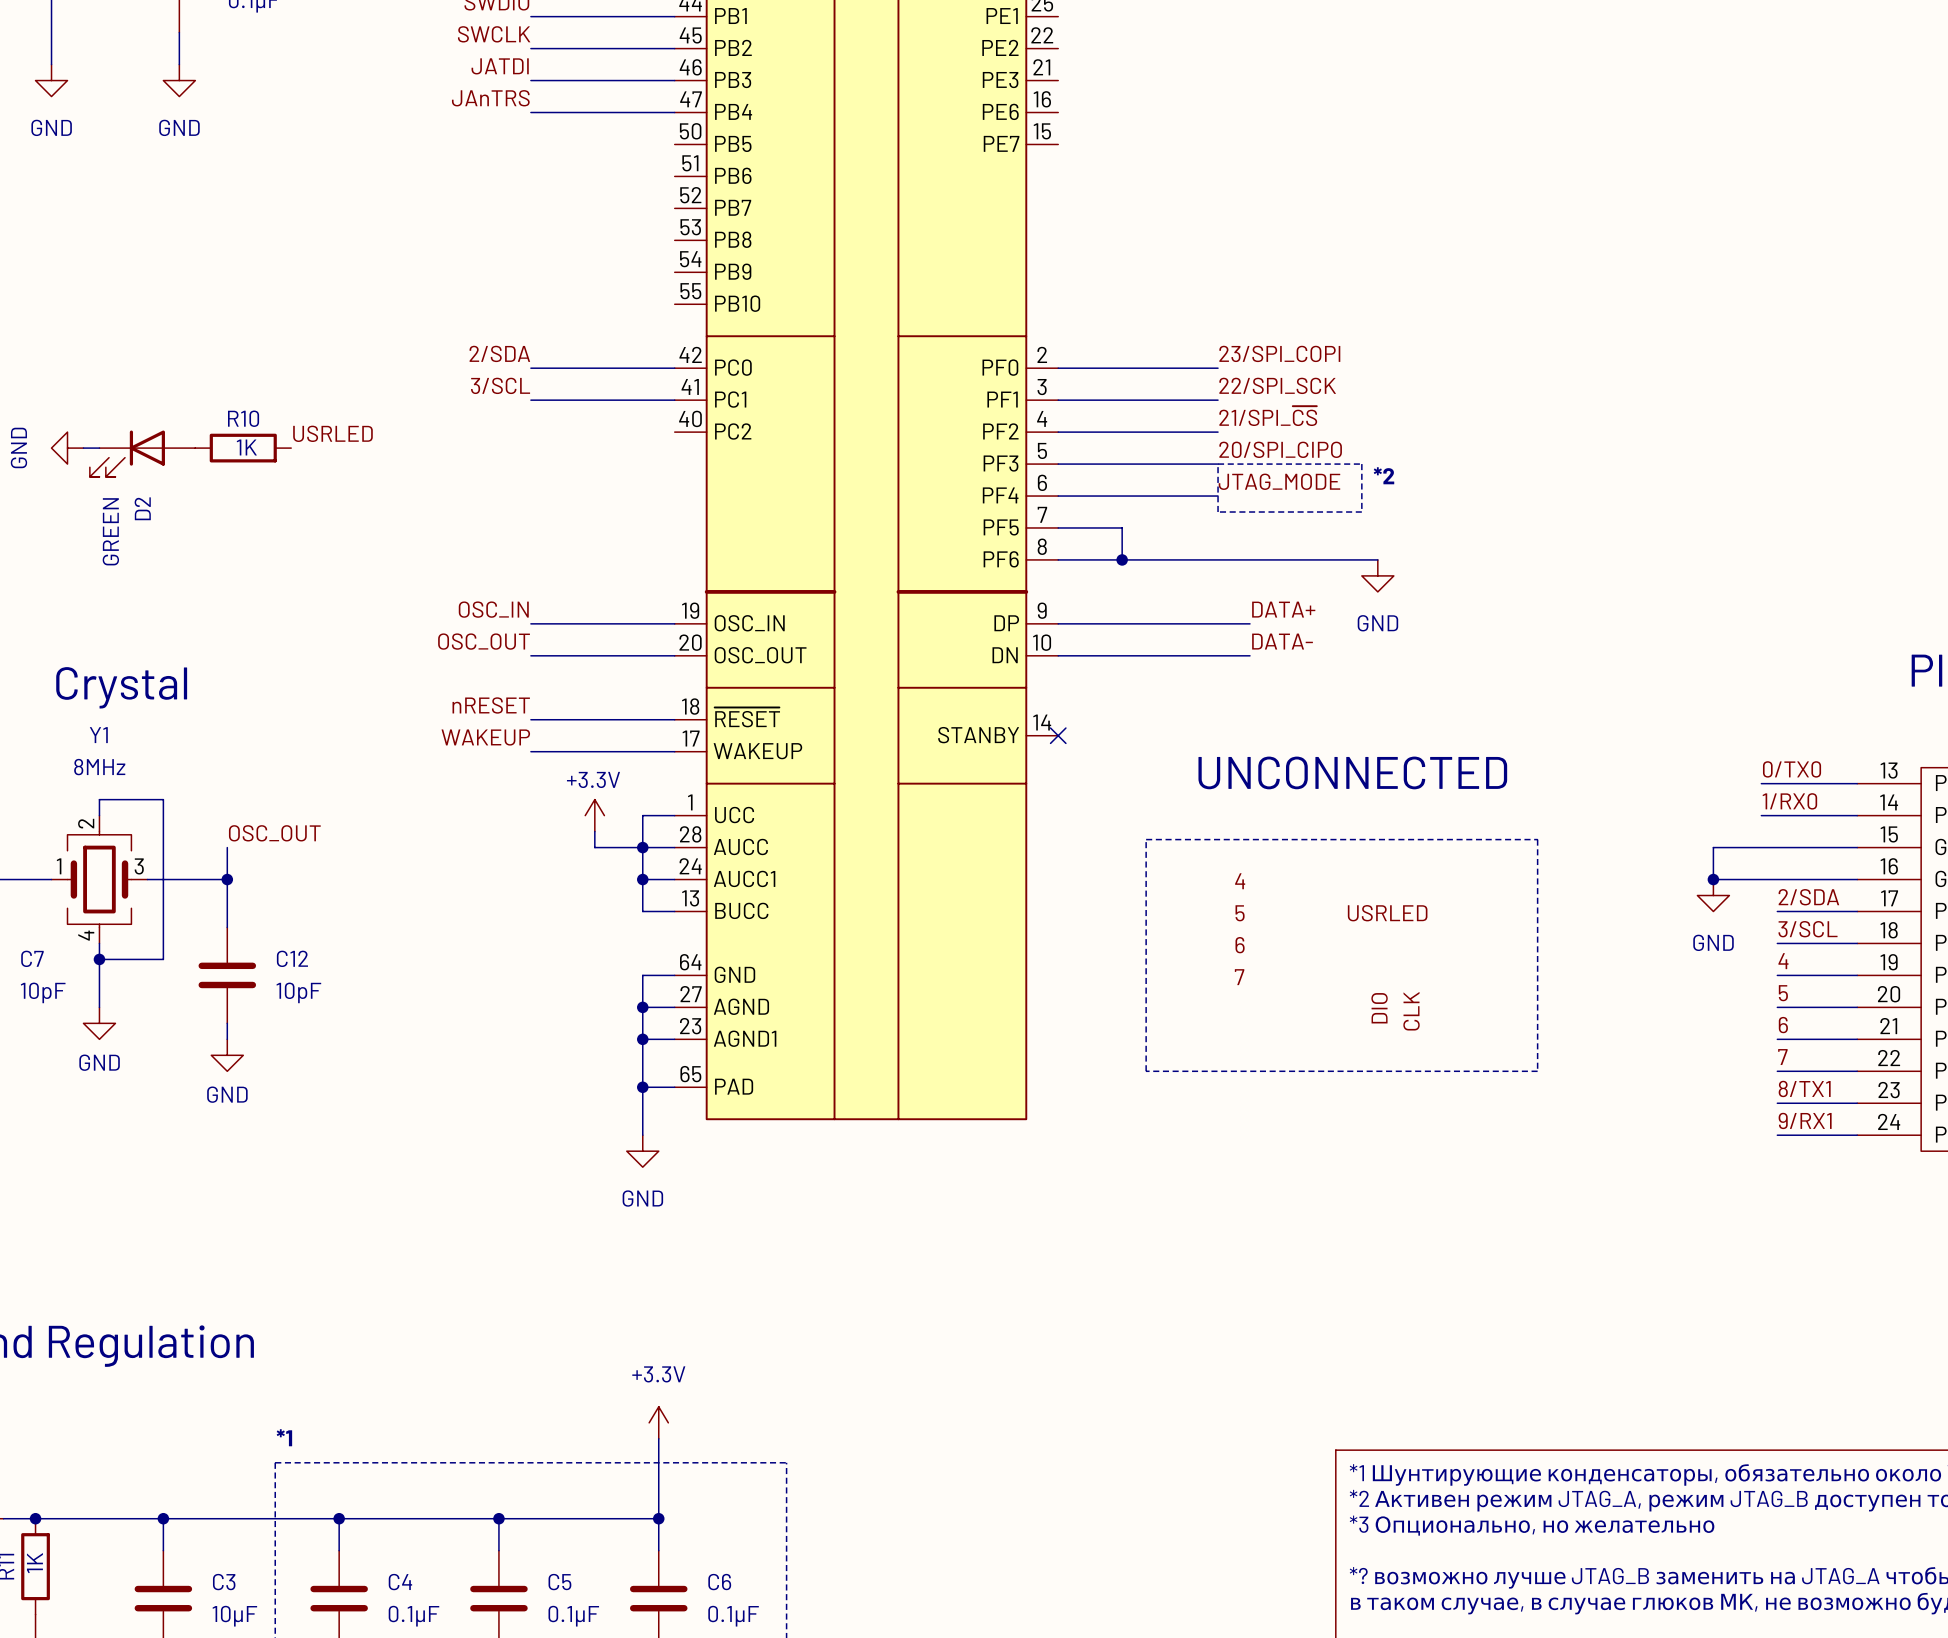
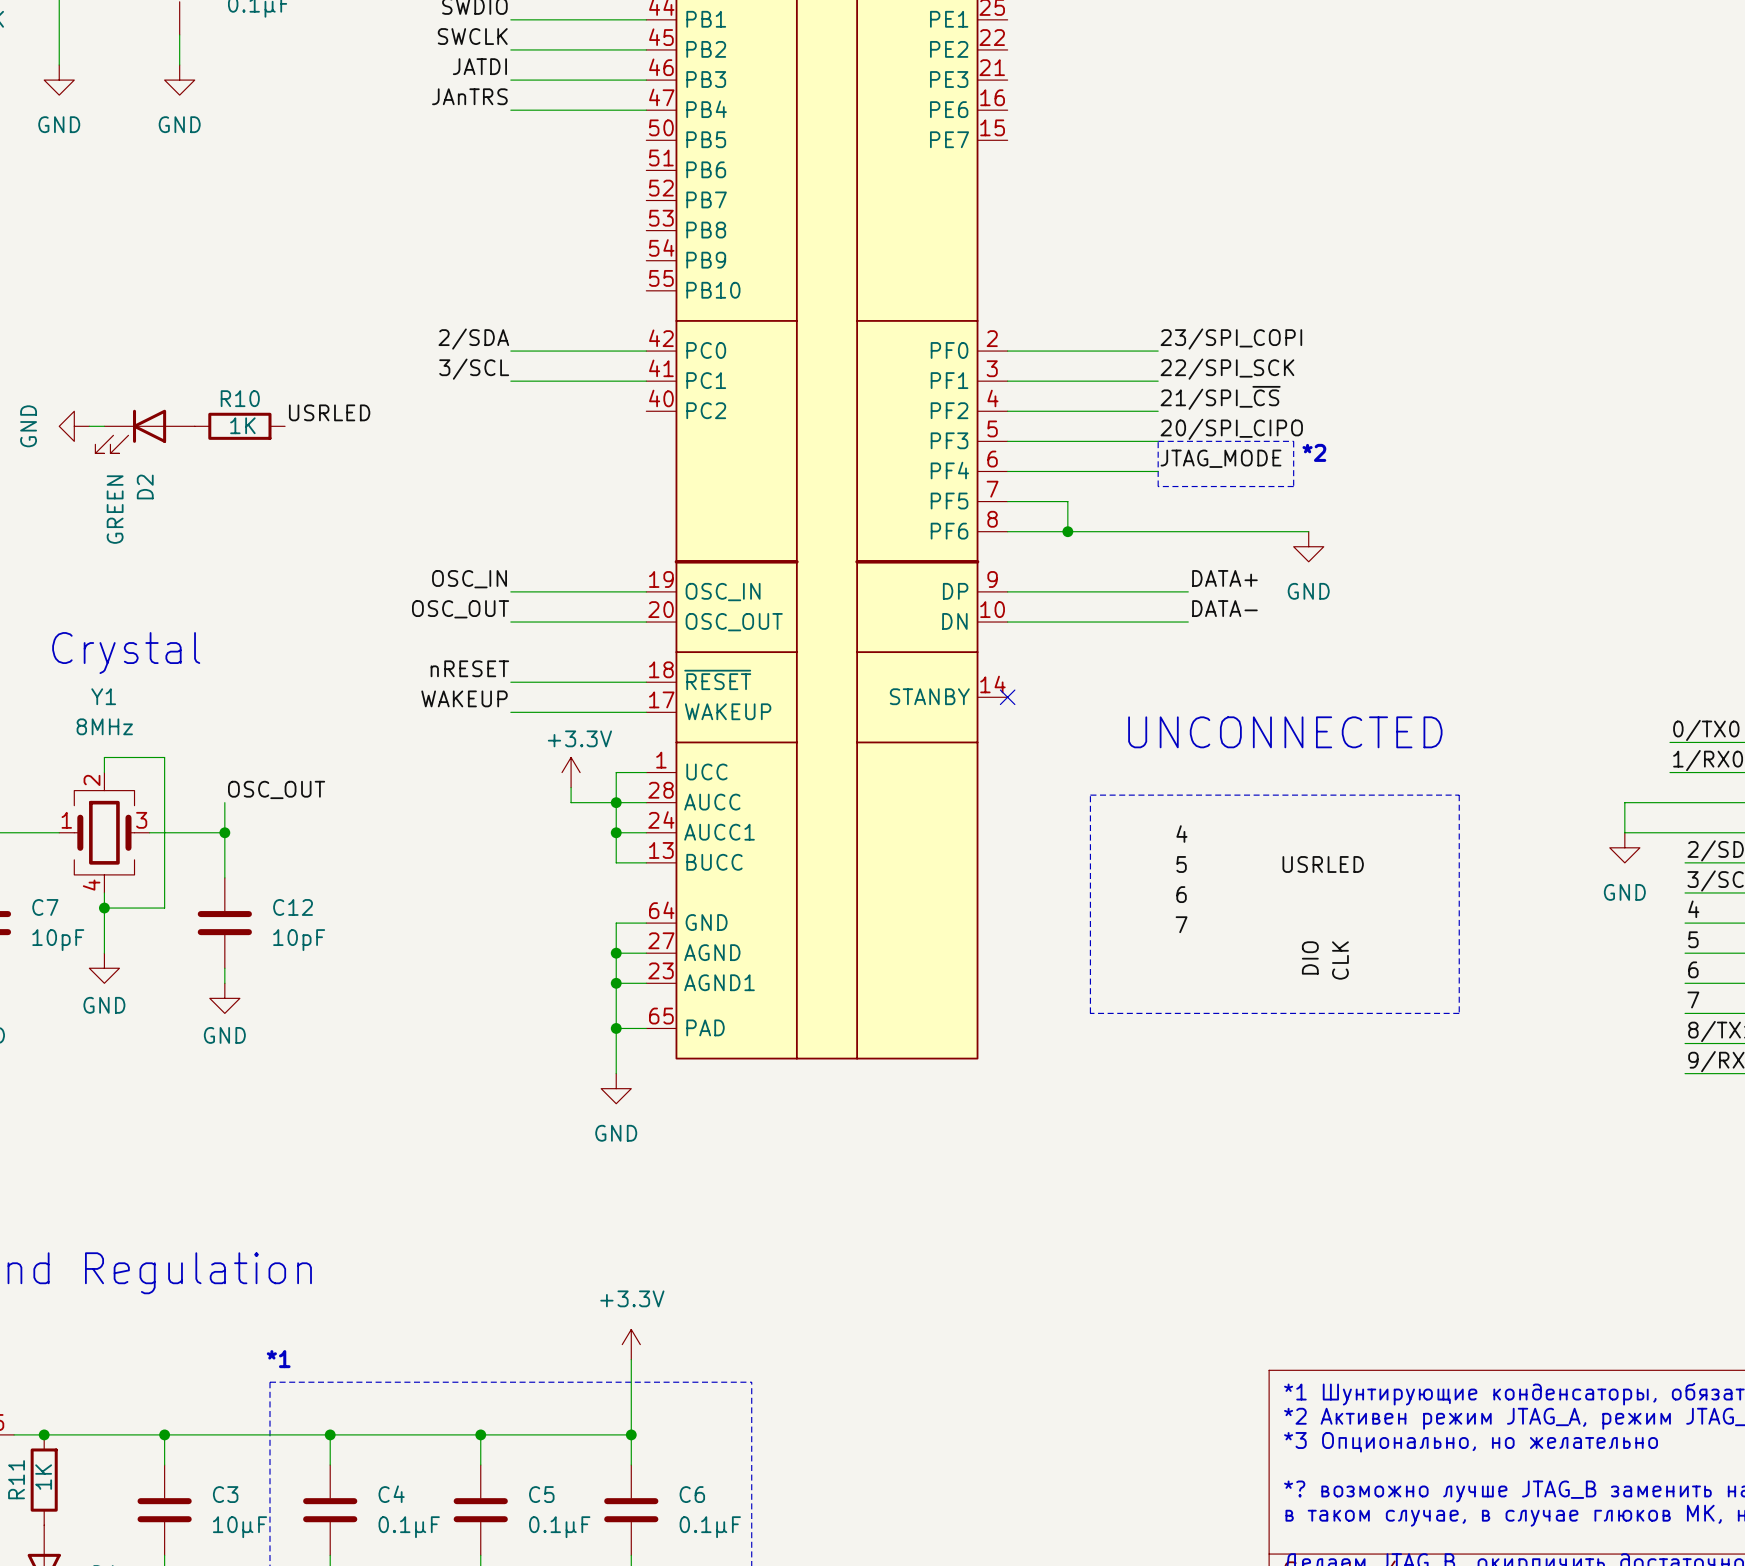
junction: (1713, 879) -> none

